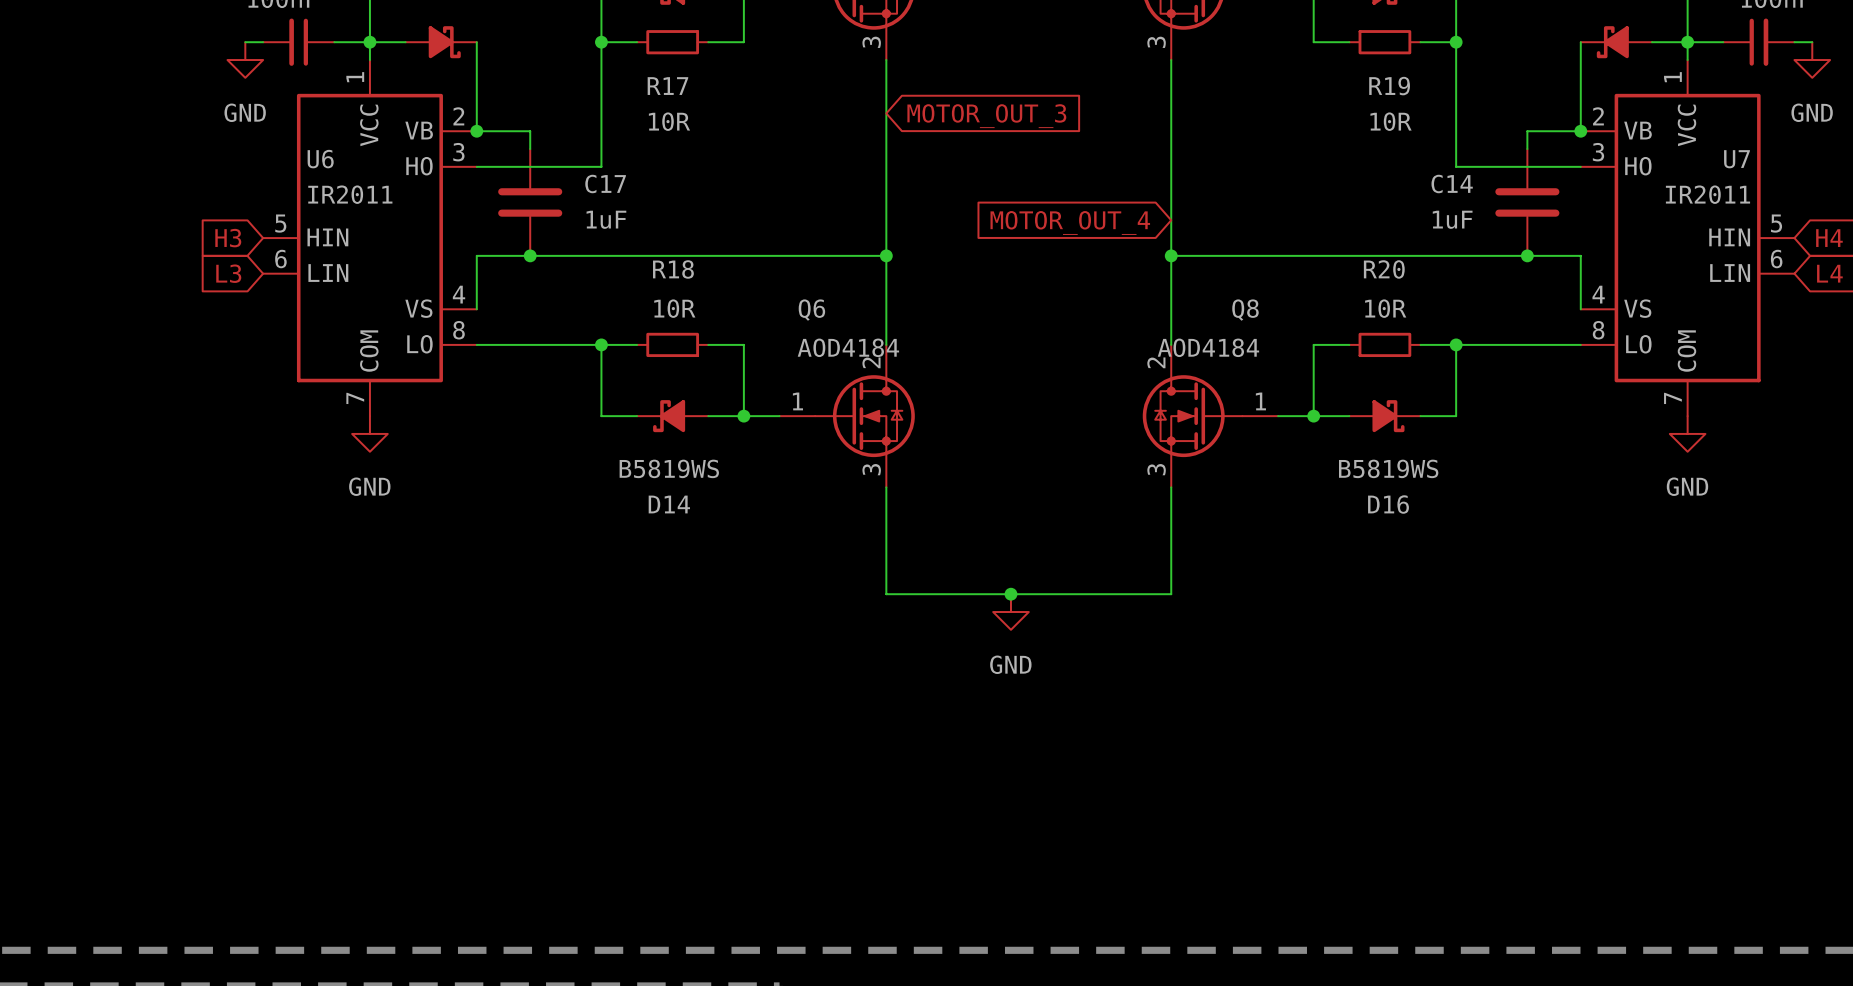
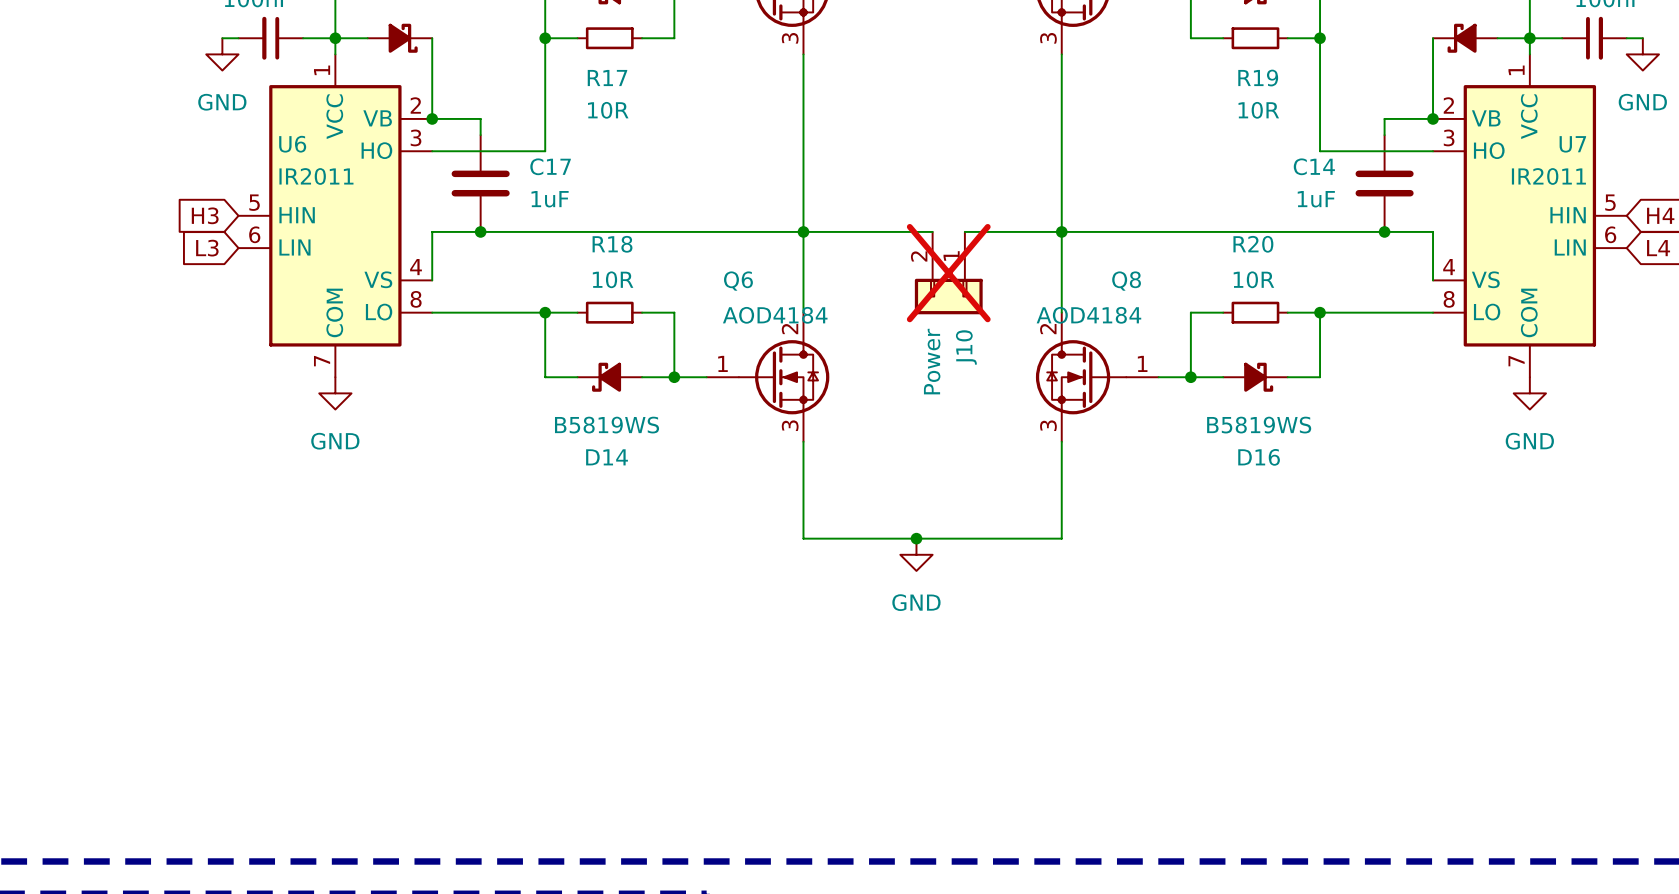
global label: MOTOR_OUT_3 (986, 116) -> none
global label: MOTOR_OUT_4 (1070, 222) -> none
wire: none -> (803, 231) (932, 231)
wire: none -> (964, 231) (1061, 231)
J10: none -> Power (948, 273)

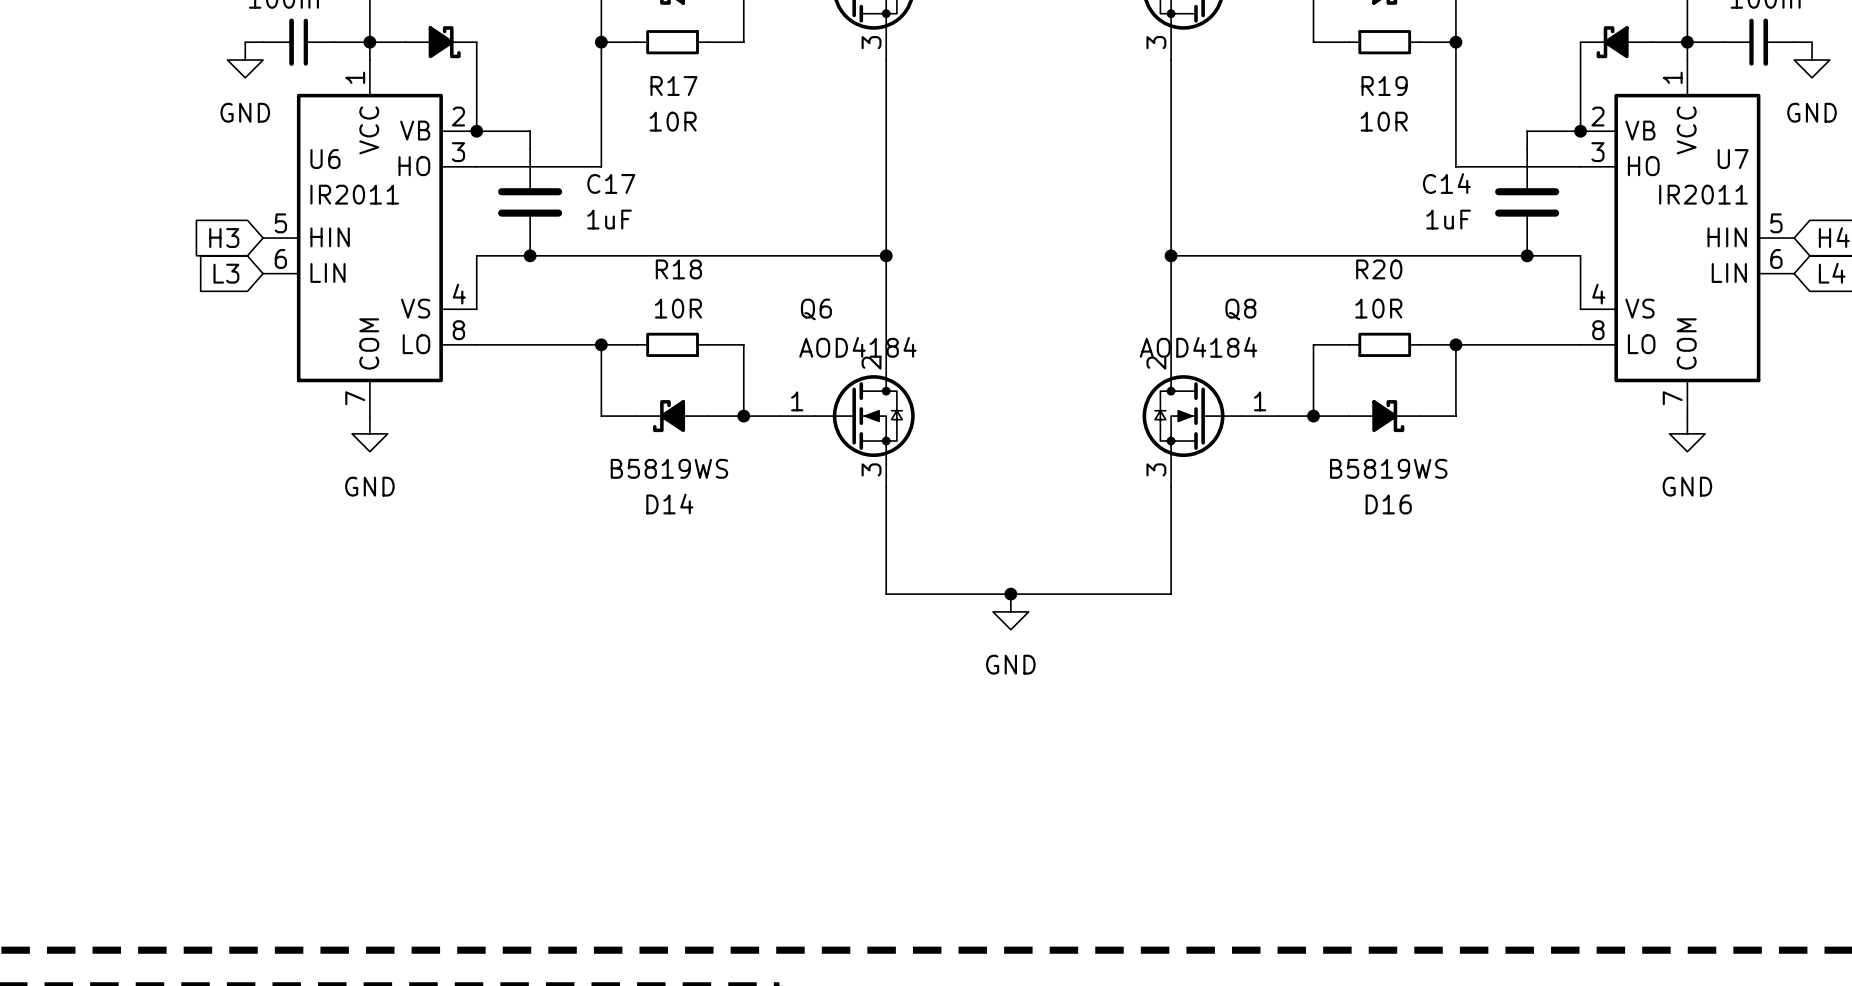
wire: (803, 231) (932, 231) -> none
wire: (964, 231) (1061, 231) -> none
J10: Power (948, 273) -> none

